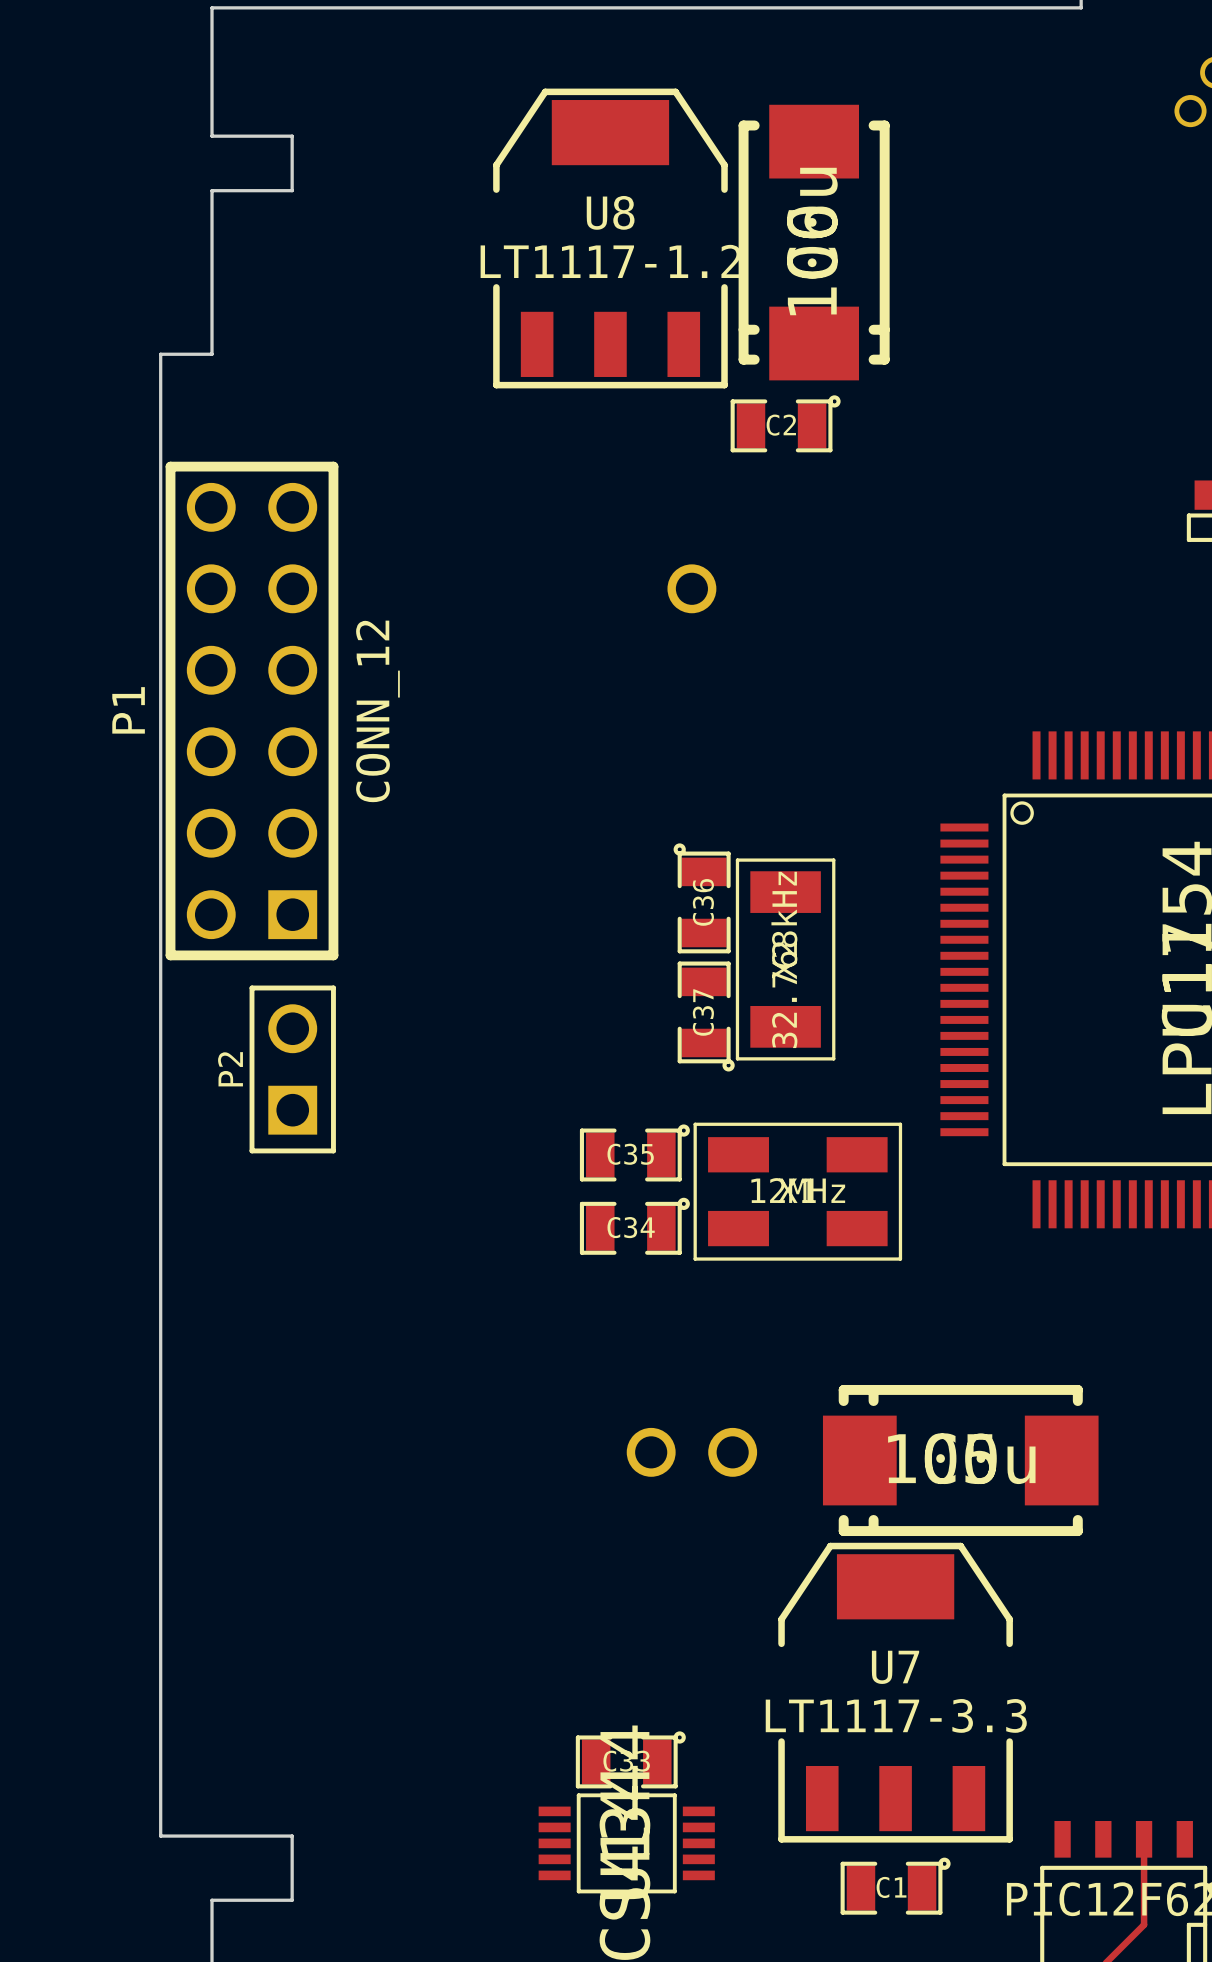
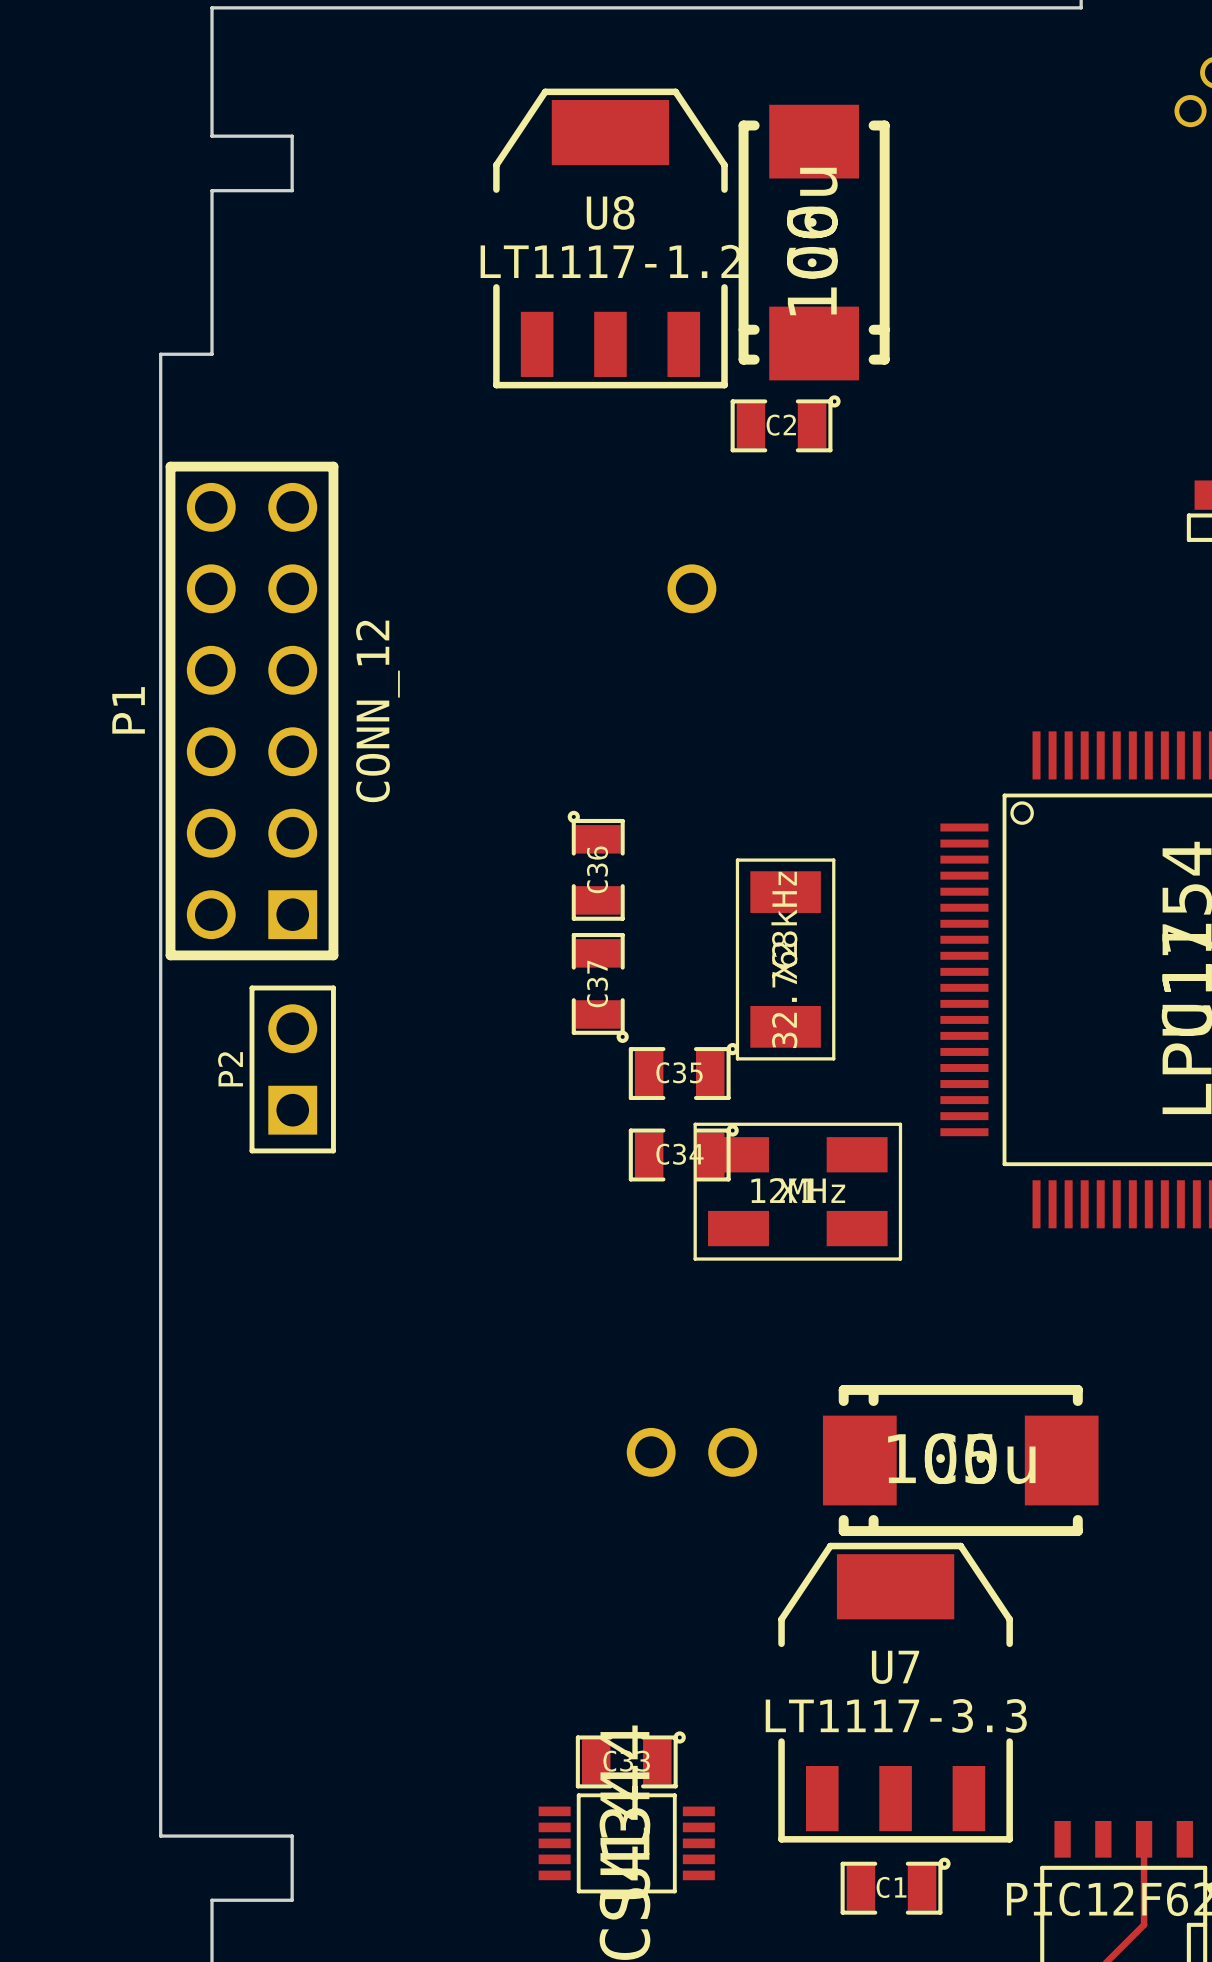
C36 position: (702, 898) -> (596, 865)
C37 position: (706, 1016) -> (600, 987)
C35 position: (634, 1152) -> (683, 1071)
C34 position: (634, 1226) -> (683, 1152)

